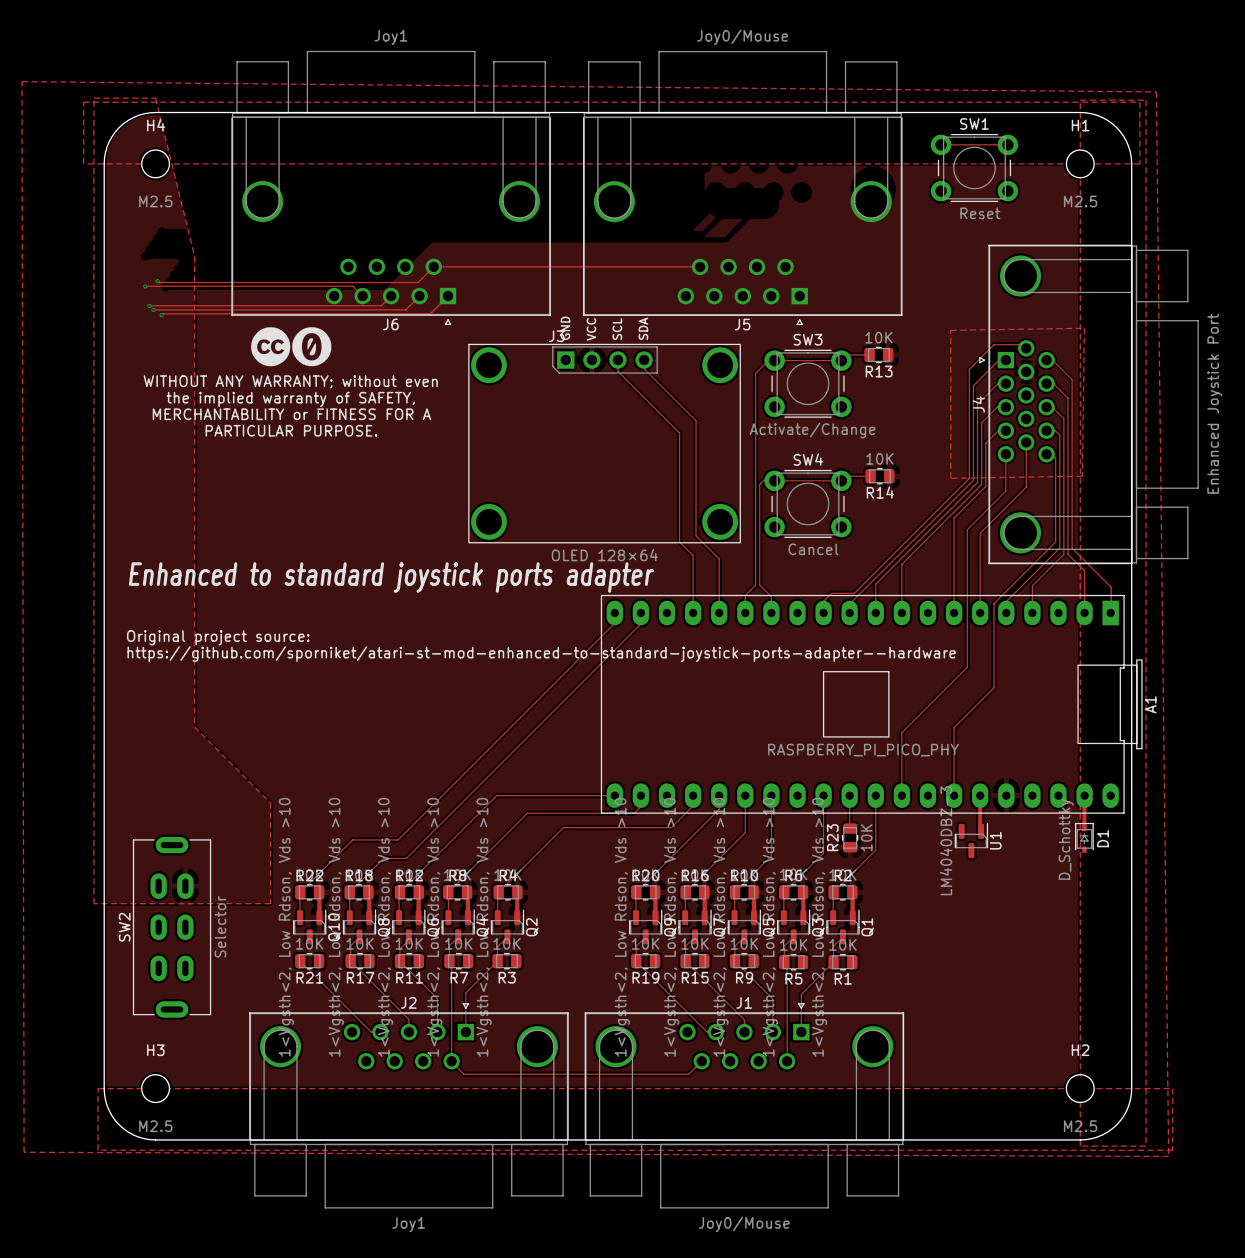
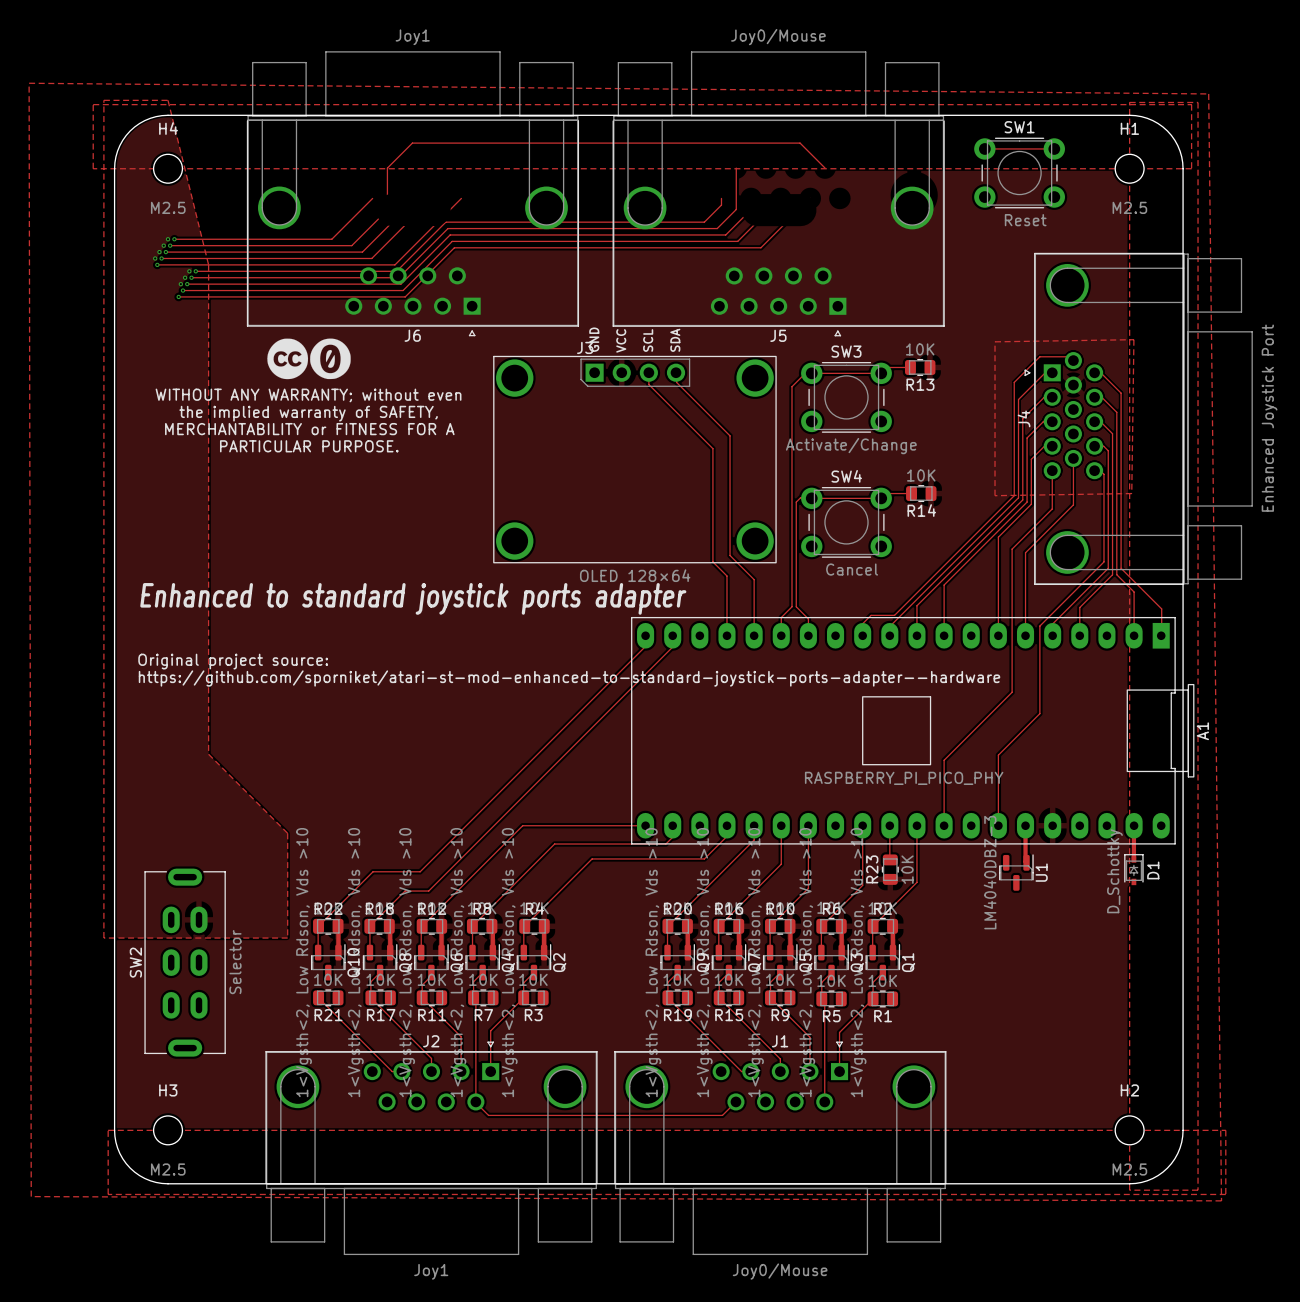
track: none -> (736, 168) (736, 209) (717, 228) (447, 228) (398, 277) (191, 277)
track: none -> (825, 168) (800, 143) (412, 143) (387, 168) (387, 210) (351, 245) (170, 245)
track: none -> (372, 198) (331, 239) (174, 239)
track: none -> (402, 198) (402, 212) (362, 252) (165, 252)
track: none -> (431, 198) (371, 258) (161, 258)
track: none -> (461, 198) (394, 264) (157, 264)
track: none -> (721, 198) (721, 205) (704, 222) (445, 222) (396, 271) (195, 271)
track: none -> (751, 198) (751, 209) (725, 234) (450, 234) (400, 284) (187, 284)
track: none -> (780, 198) (737, 241) (452, 241) (403, 290) (182, 290)
track: none -> (810, 198) (760, 247) (454, 247) (405, 296) (178, 296)
via: none -> (168, 239)
via: none -> (174, 239)
via: none -> (163, 245)
via: none -> (170, 245)
via: none -> (159, 252)
via: none -> (165, 252)
via: none -> (155, 258)
via: none -> (161, 258)
via: none -> (157, 264)
via: none -> (189, 271)
via: none -> (195, 271)
track: (699, 266) (433, 266) (418, 282) (157, 281) -> none
via: none -> (185, 277)
via: none -> (191, 277)
via: none -> (180, 284)
via: none -> (187, 284)
via: (157, 281) -> none
via: none -> (182, 290)
track: (145, 286) (352, 286) (362, 296) -> none
via: (145, 286) -> none
via: none -> (178, 296)
track: (391, 296) (381, 305) (149, 306) -> none
track: (419, 296) (405, 309) (153, 309) -> none
track: (448, 296) (430, 313) (161, 315) -> none
via: (149, 306) -> none
via: (153, 309) -> none
via: (161, 315) -> none

